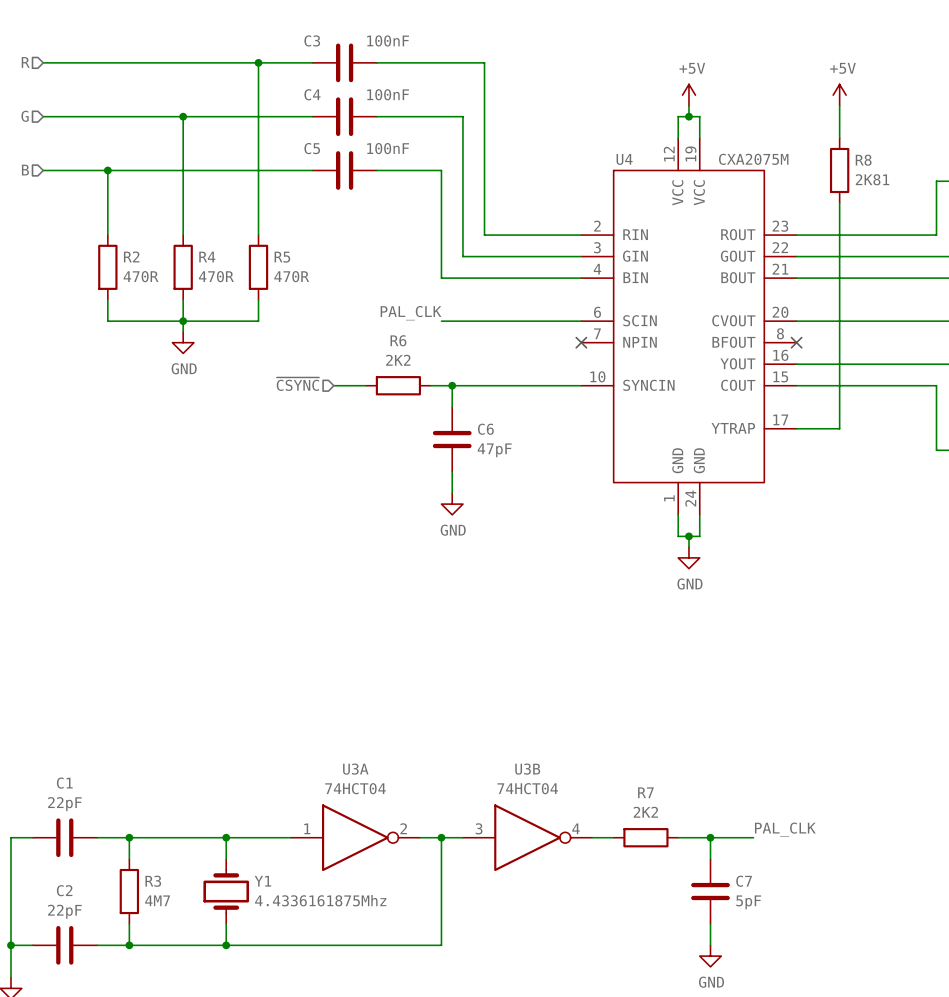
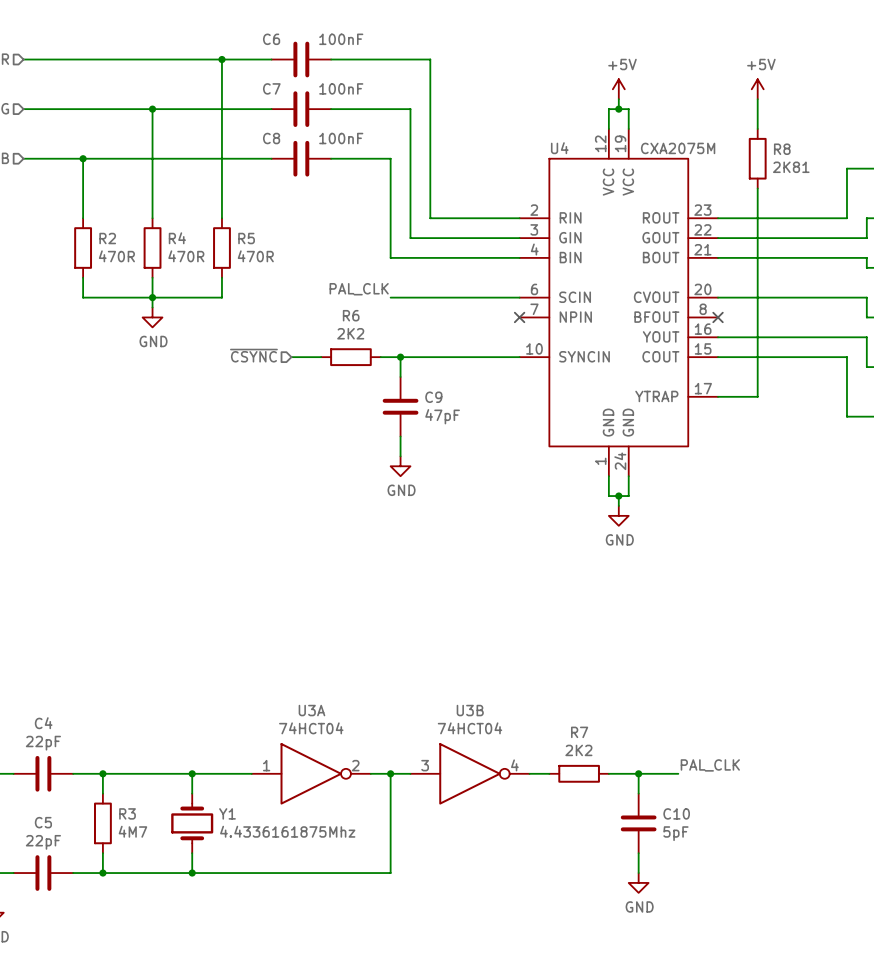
C3 name: C3 (312, 40) -> C6 (271, 39)
C4 name: C4 (312, 94) -> C7 (271, 88)
C5 name: C5 (312, 148) -> C8 (271, 138)
C6 name: C6 (485, 429) -> C9 (433, 397)
C1 name: C1 (64, 783) -> C4 (43, 723)
C7 name: C7 (744, 881) -> C10 (676, 813)
C2 name: C2 (64, 890) -> C5 (43, 822)

